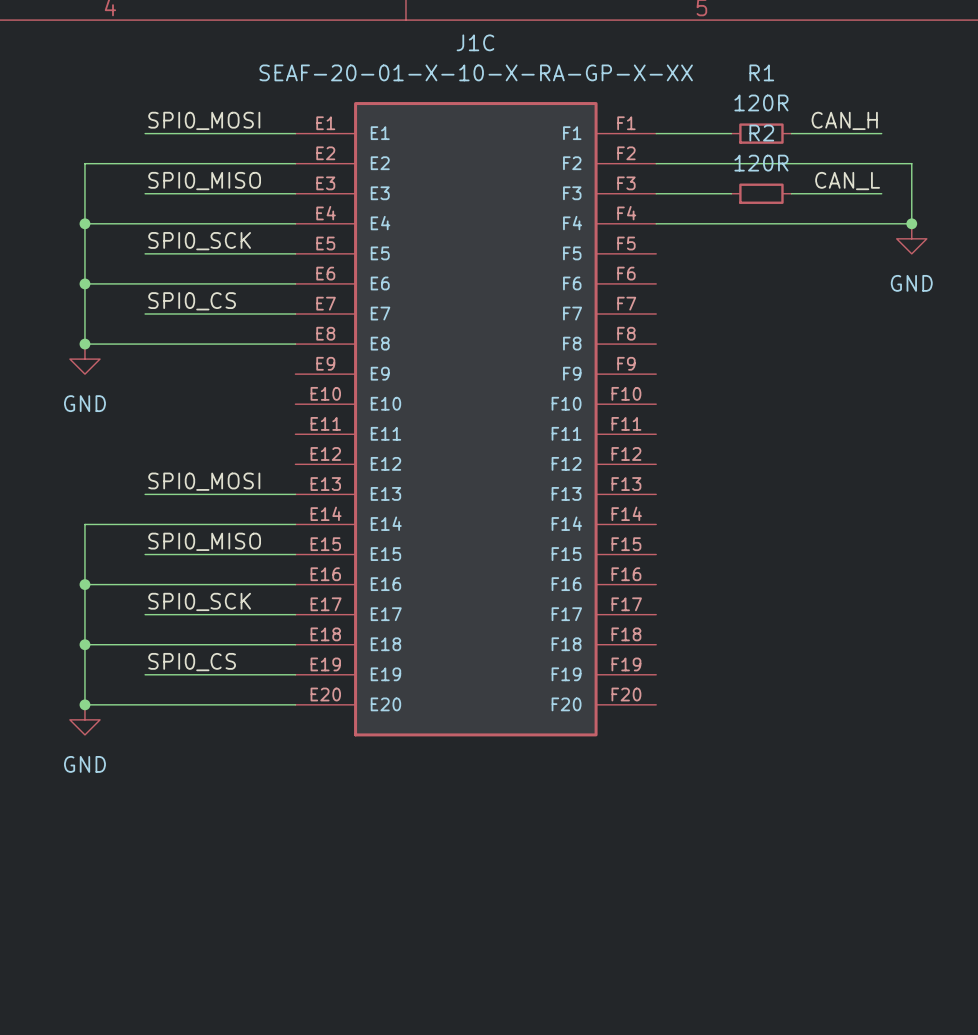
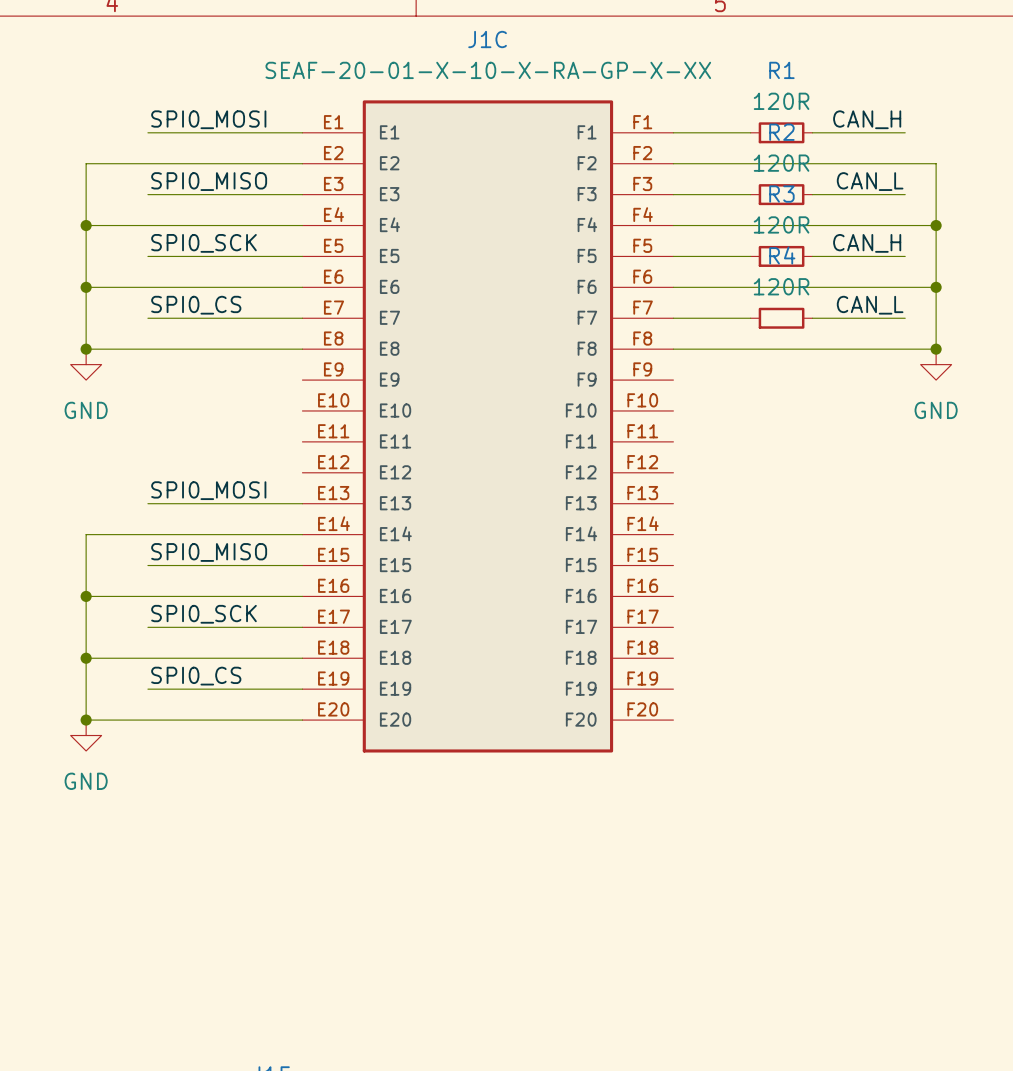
wire: none -> (936, 225) (936, 349) (673, 349)
power symbol position: GND (911, 238) -> GND (936, 364)
label: none -> CAN_H (867, 243)
wire: none -> (673, 256) (750, 256)
R3: none -> 120R (781, 256)
wire: none -> (812, 256) (905, 256)
wire: none -> (673, 287) (936, 287)
junction: none -> (936, 287)
label: none -> CAN_L (870, 305)
wire: none -> (673, 318) (750, 318)
R4: none -> 120R (781, 318)
wire: none -> (812, 318) (905, 318)
junction: none -> (936, 349)

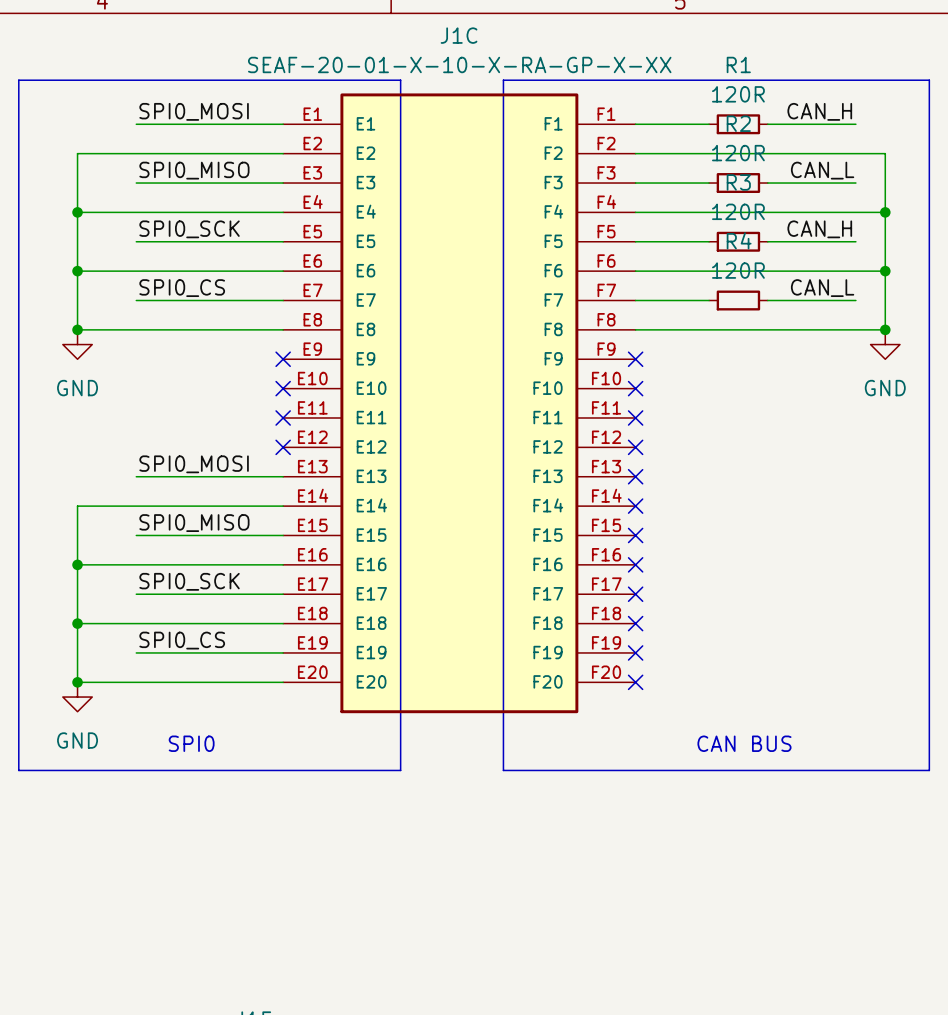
line: none -> (18, 80) (400, 80) (400, 770) (18, 770) (18, 80)
line: none -> (503, 80) (929, 80) (929, 770) (503, 770) (503, 80)
no-connect mark: none -> (283, 359)
no-connect mark: none -> (635, 359)
no-connect mark: none -> (283, 388)
no-connect mark: none -> (635, 388)
no-connect mark: none -> (283, 417)
no-connect mark: none -> (635, 417)
no-connect mark: none -> (283, 447)
no-connect mark: none -> (635, 447)
no-connect mark: none -> (635, 476)
no-connect mark: none -> (635, 506)
no-connect mark: none -> (635, 535)
no-connect mark: none -> (635, 564)
no-connect mark: none -> (635, 594)
no-connect mark: none -> (635, 623)
no-connect mark: none -> (635, 652)
no-connect mark: none -> (635, 682)
text: none -> SPI0 (191, 743)
text: none -> CAN BUS (744, 743)

